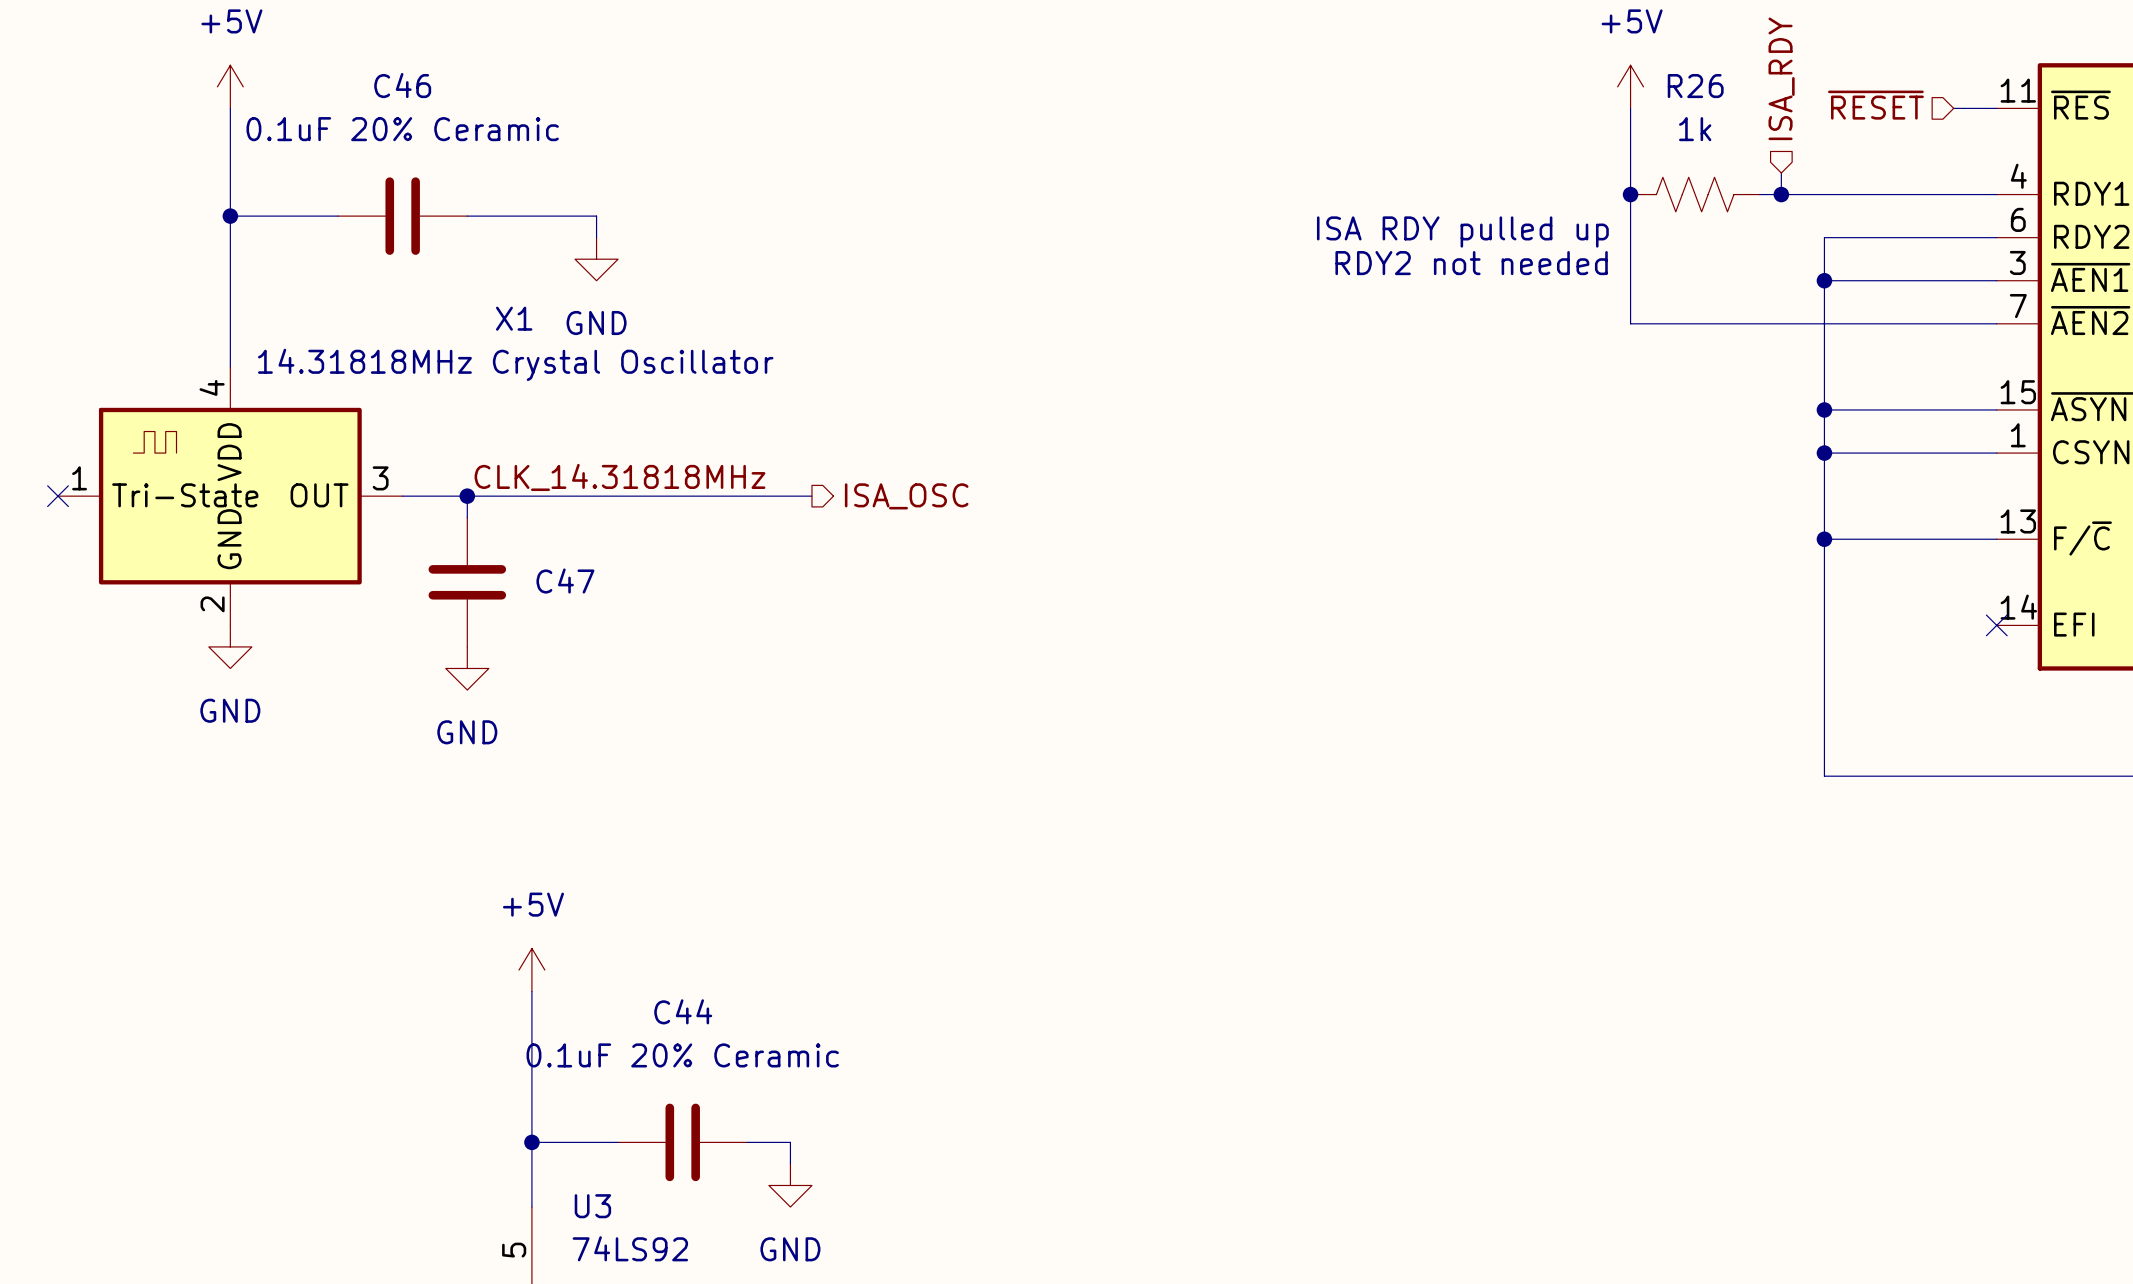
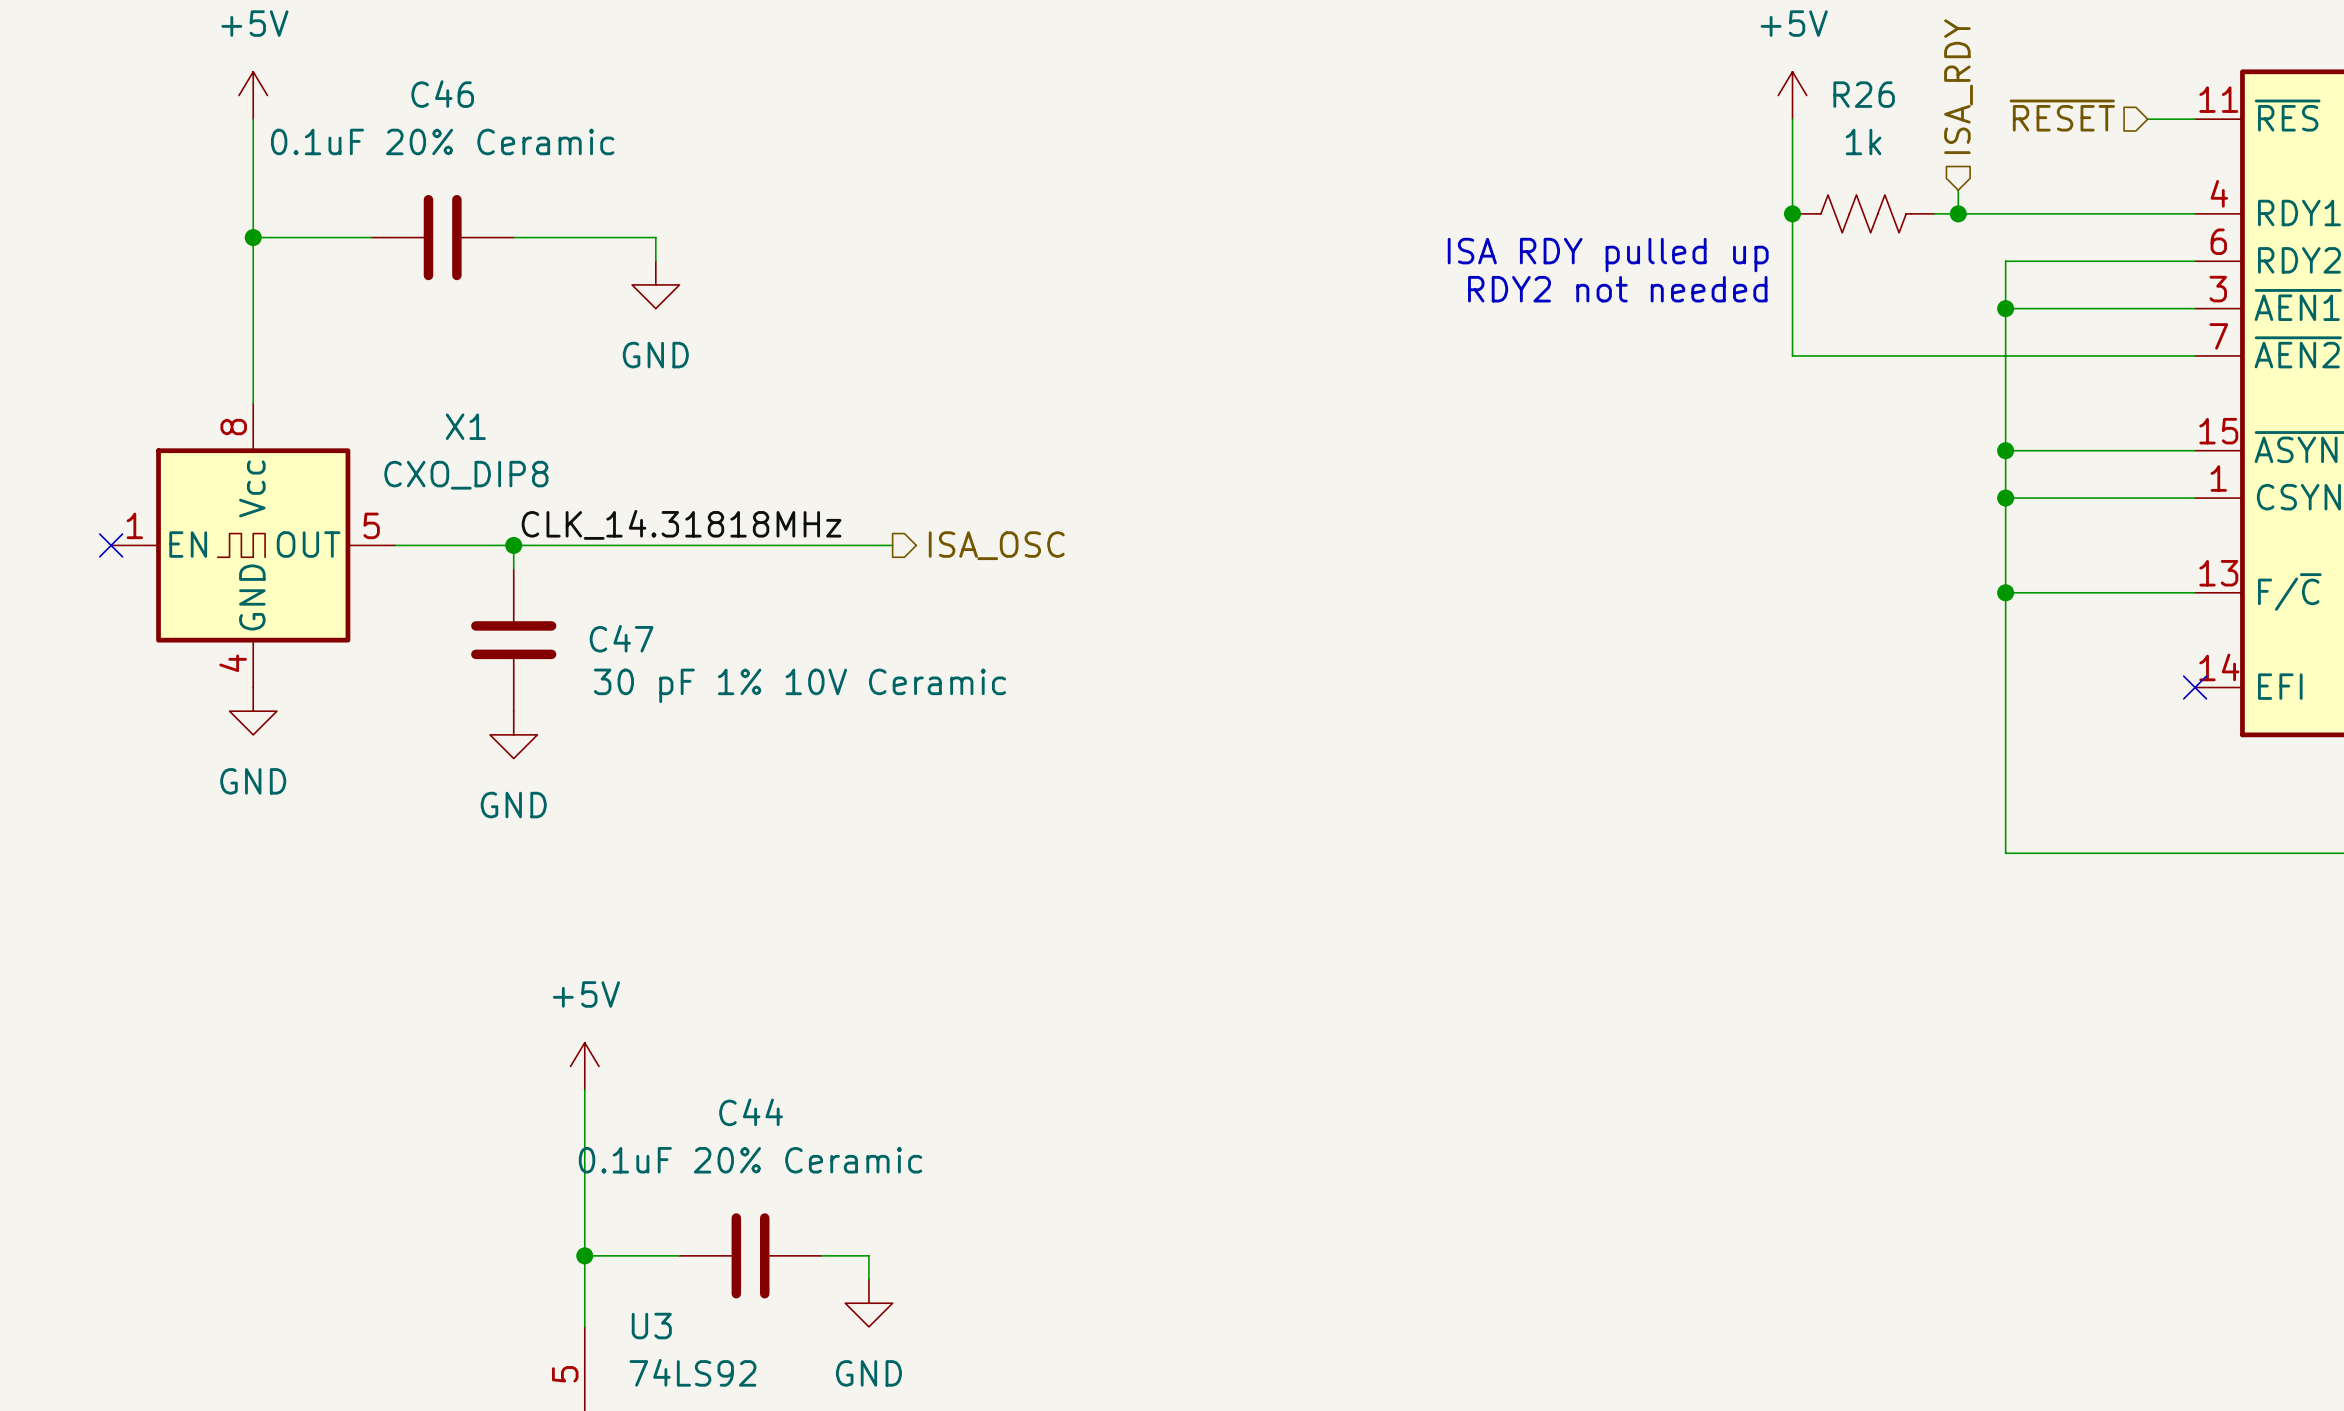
X1 name position: X1 (514, 318) -> X1 (465, 426)
X1 value: 14.31818MHz Crystal Oscillator (515, 364) -> CXO_DIP8 (466, 475)
X1 symbol: [58, 366, 403, 626] -> [111, 403, 396, 688]
no-connect mark position: (58, 496) -> (111, 545)
C47 value: none -> 30 pF 1% 10V Ceramic (799, 685)

